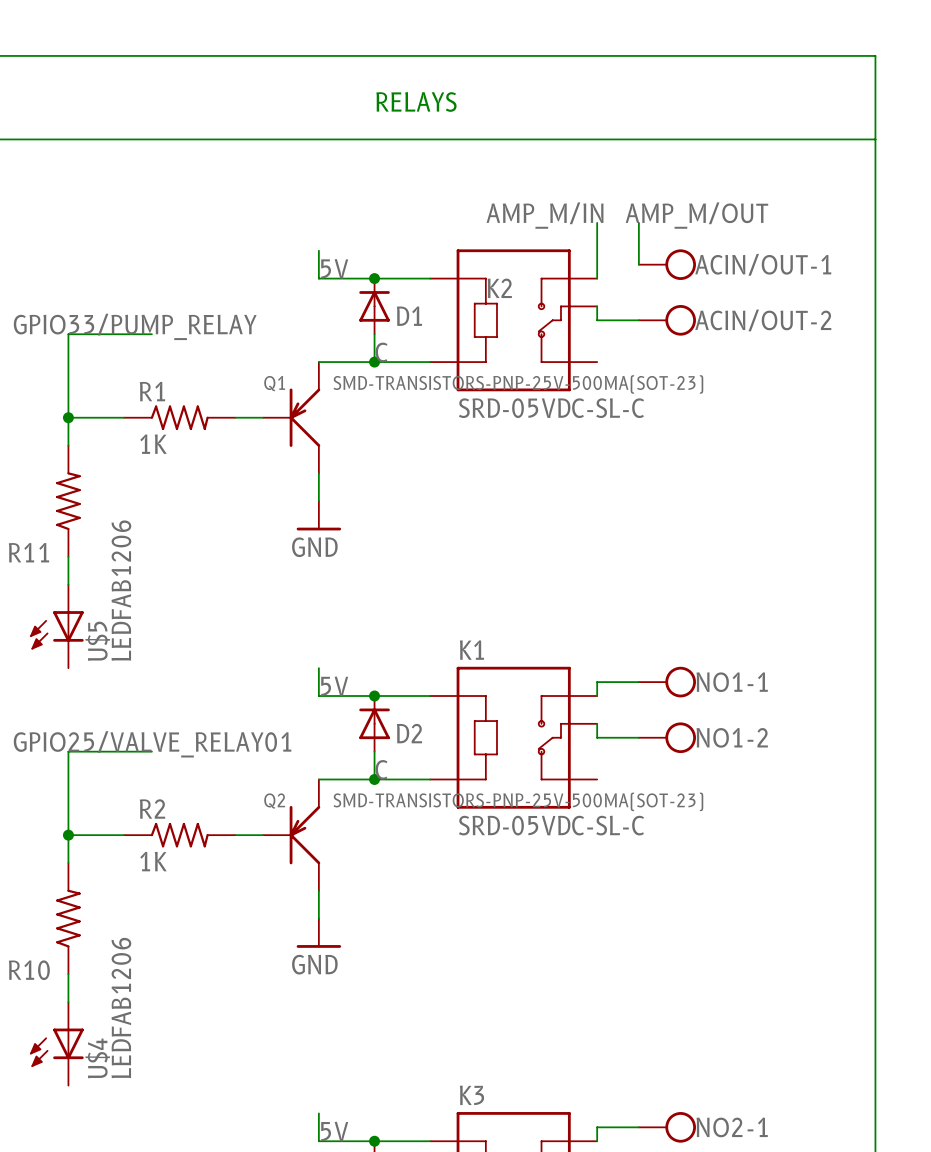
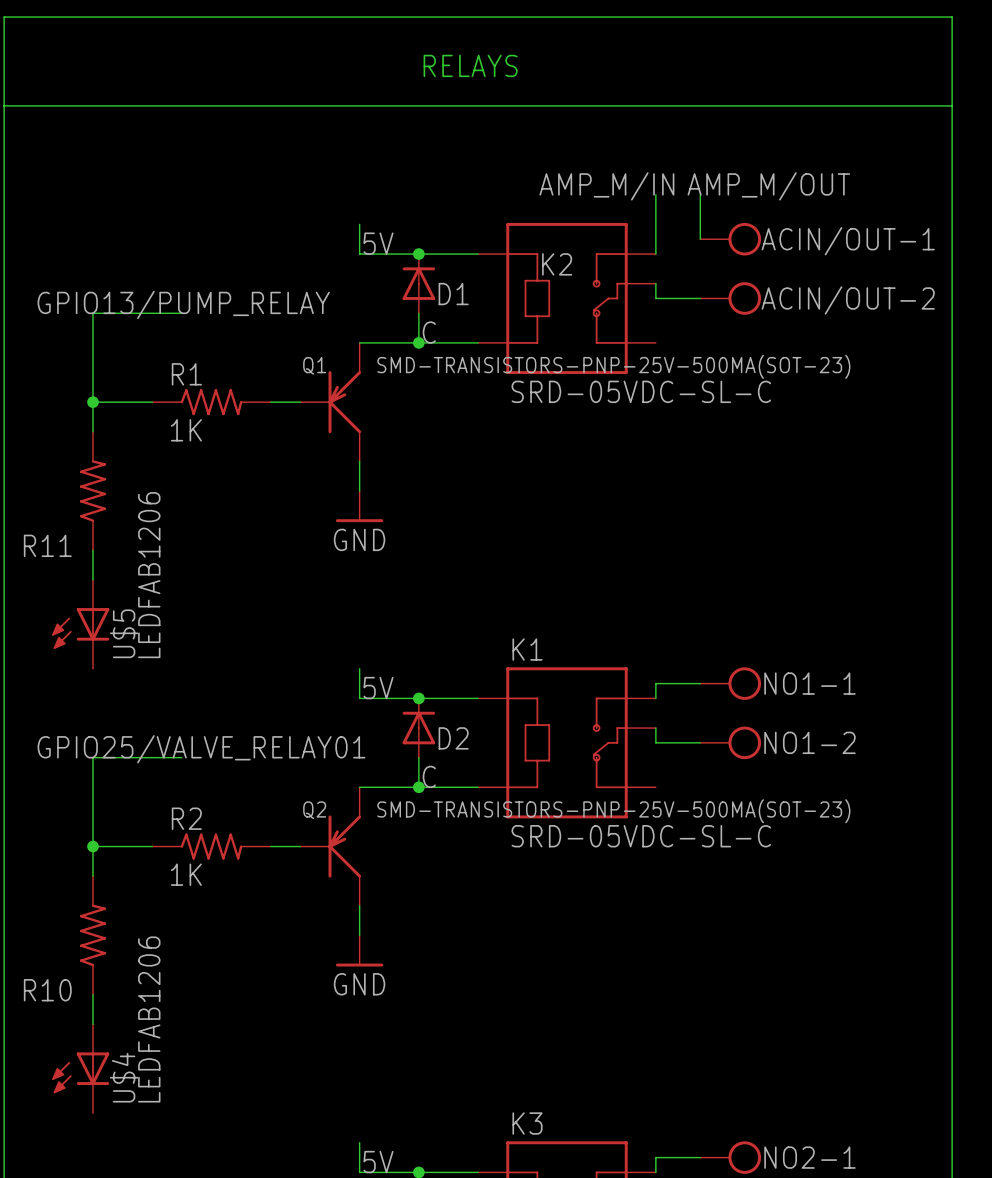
label: GPIO33/PUMP_RELAY (135, 326) -> GPIO13/PUMP_RELAY (183, 304)

